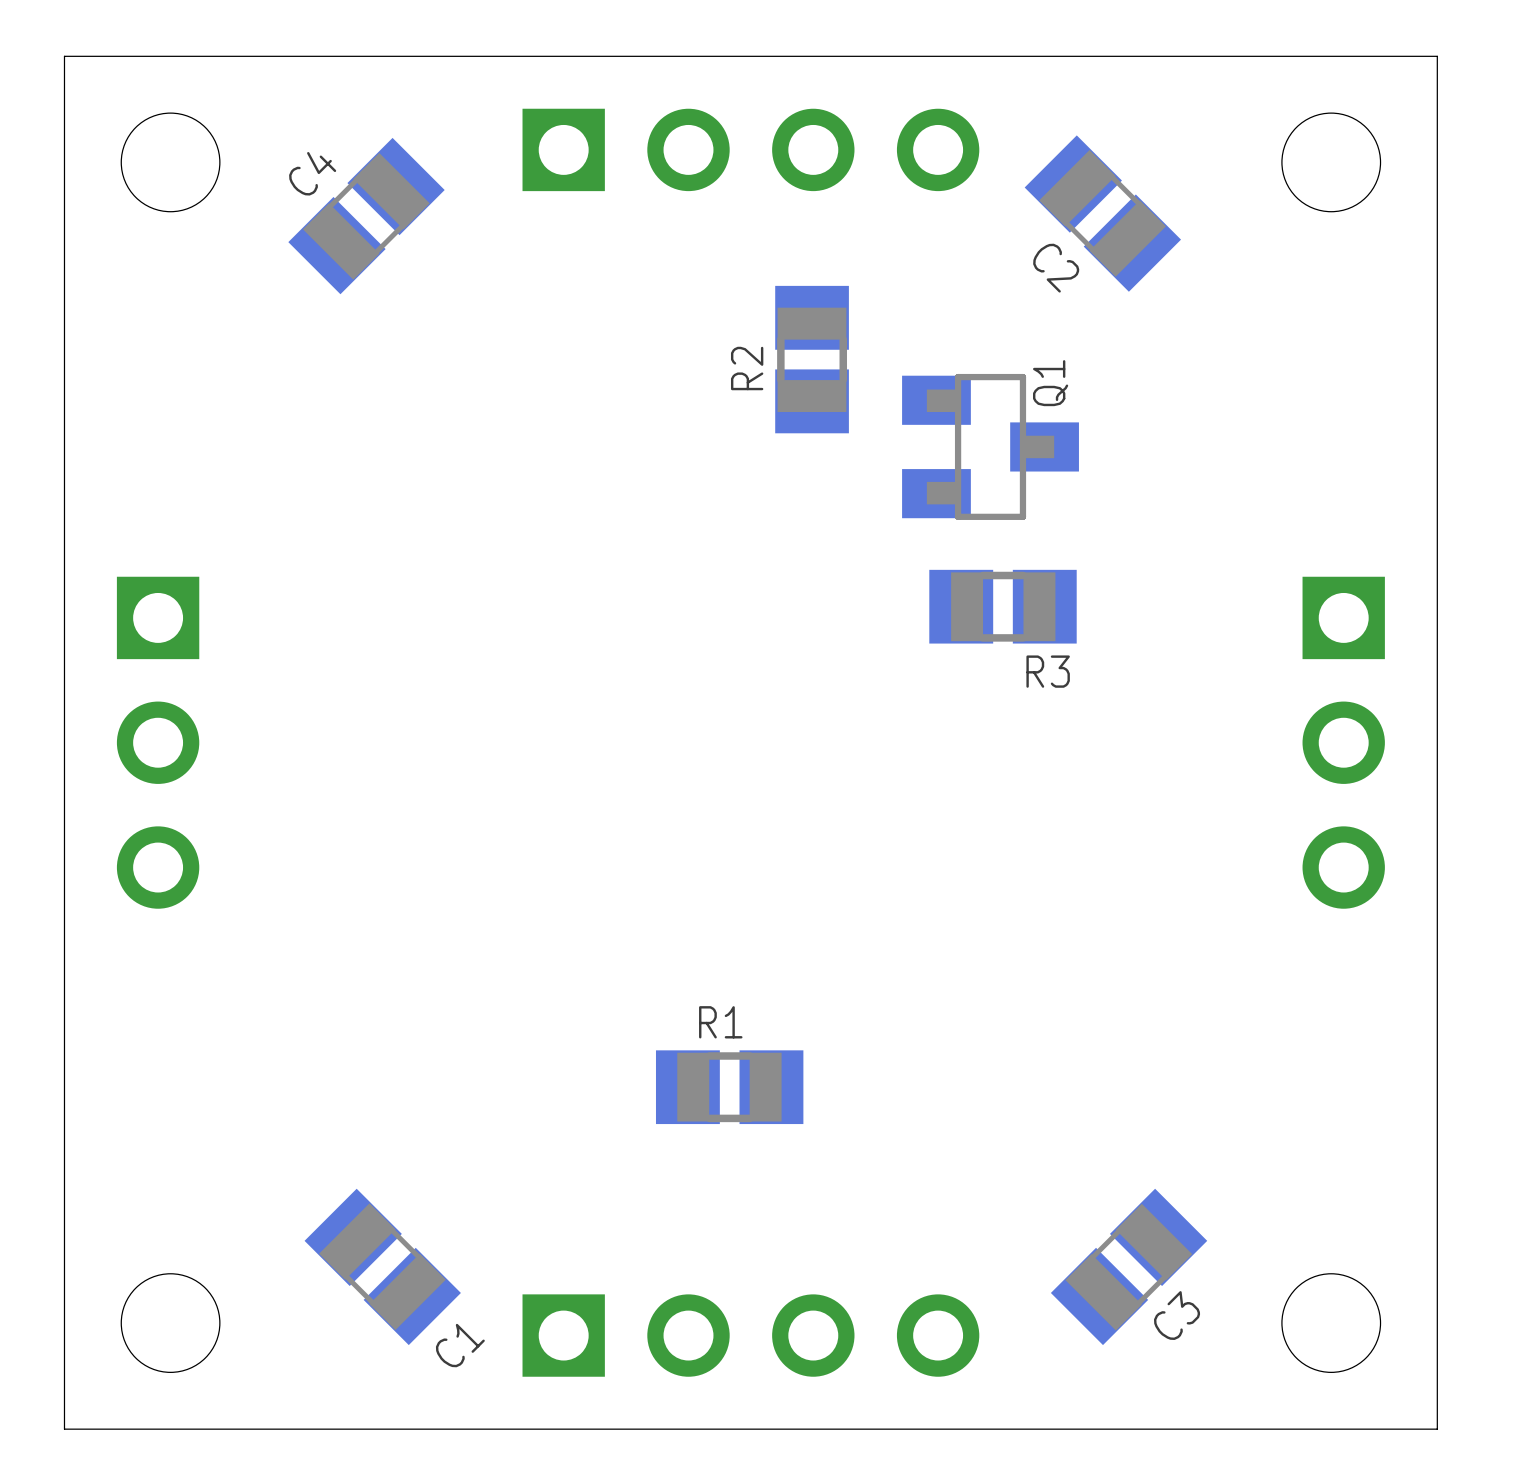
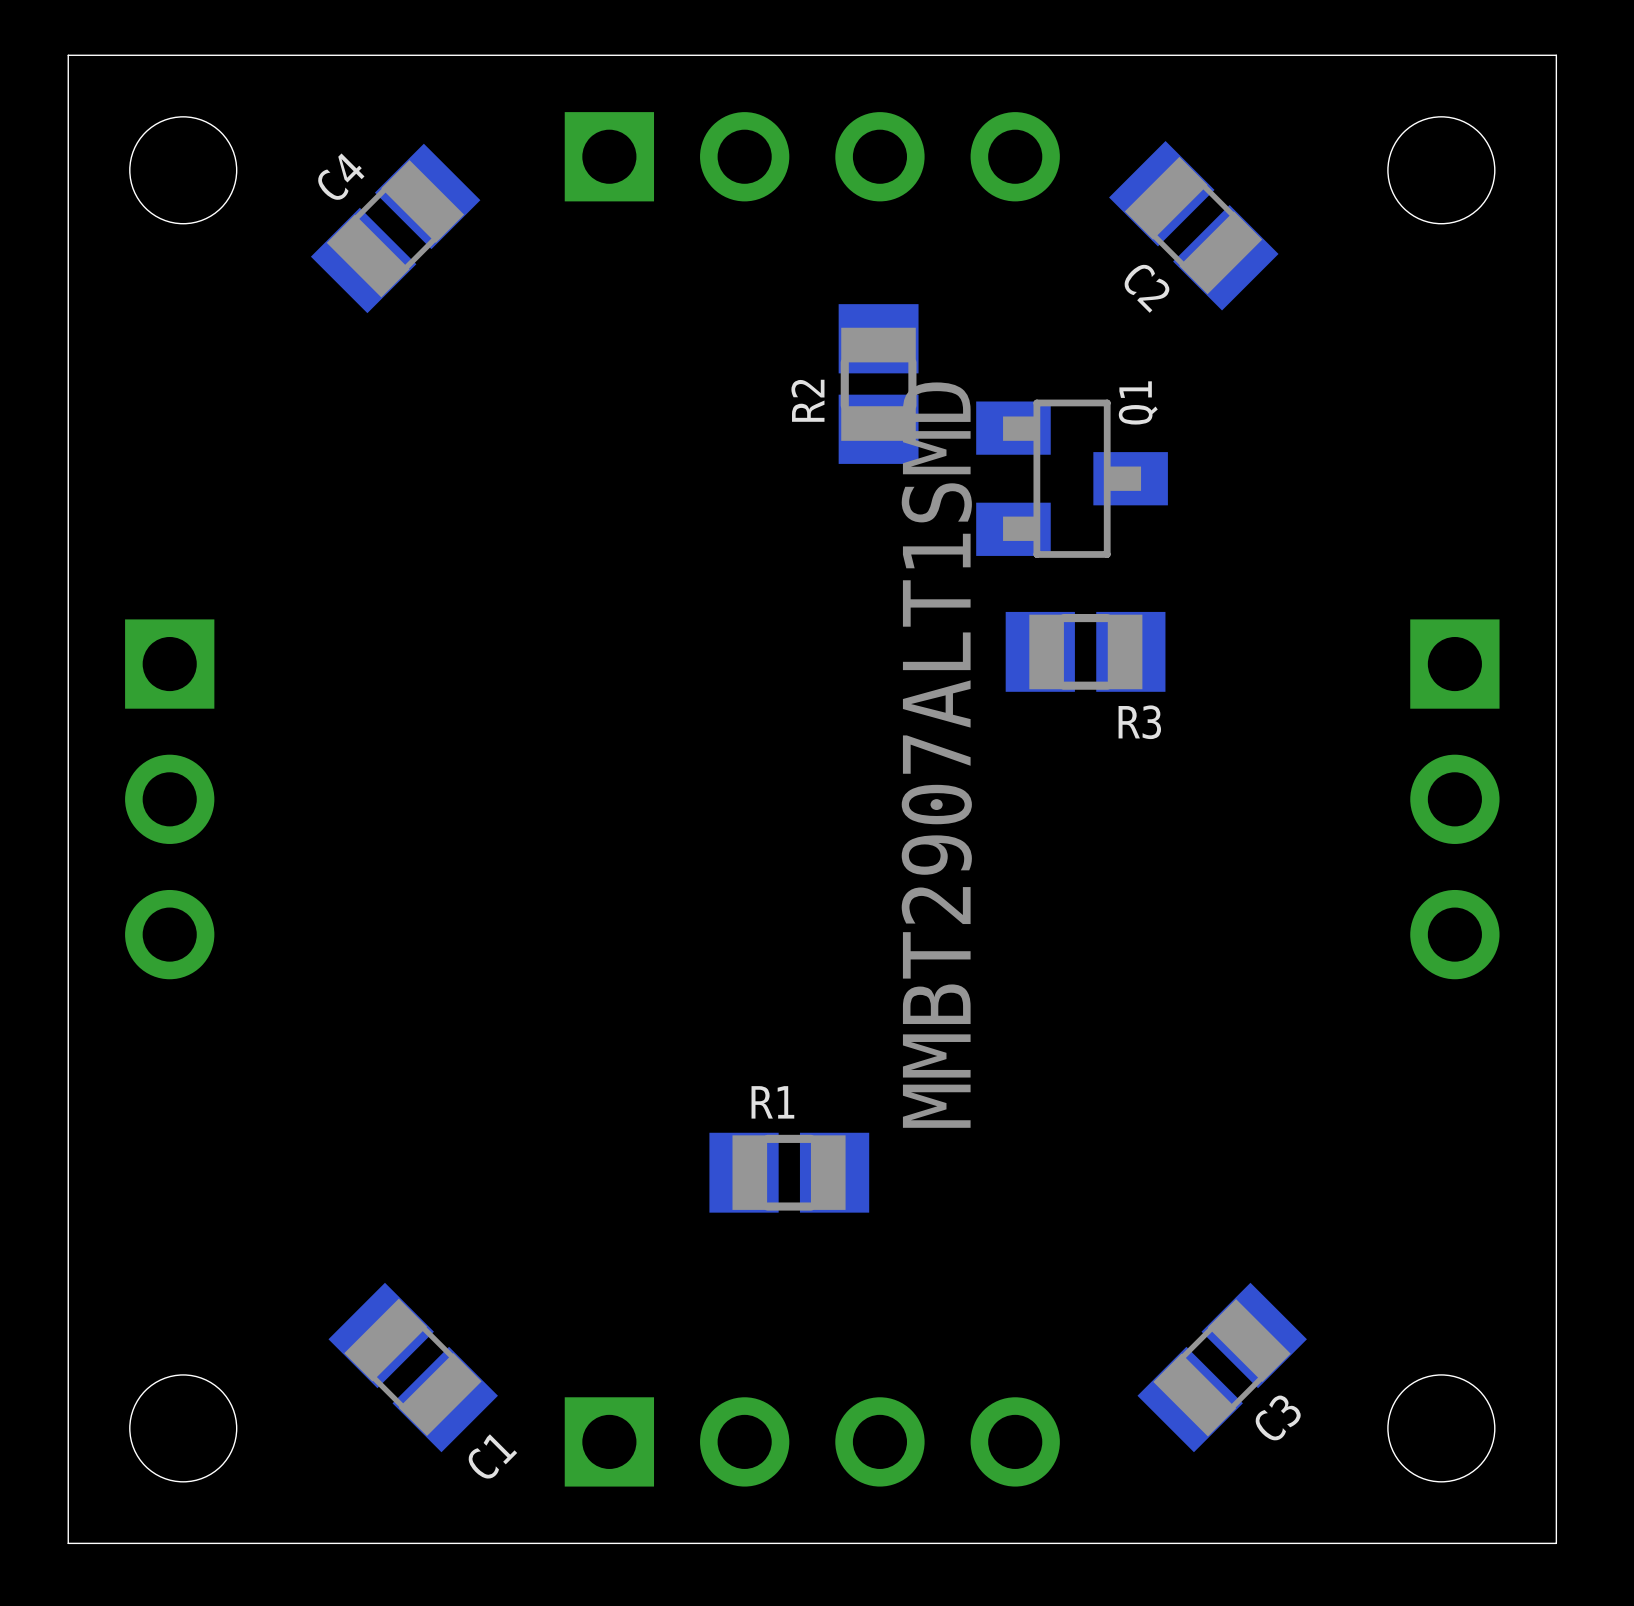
Q1 value: none -> MMBT2907ALT1SMD (936, 755)

